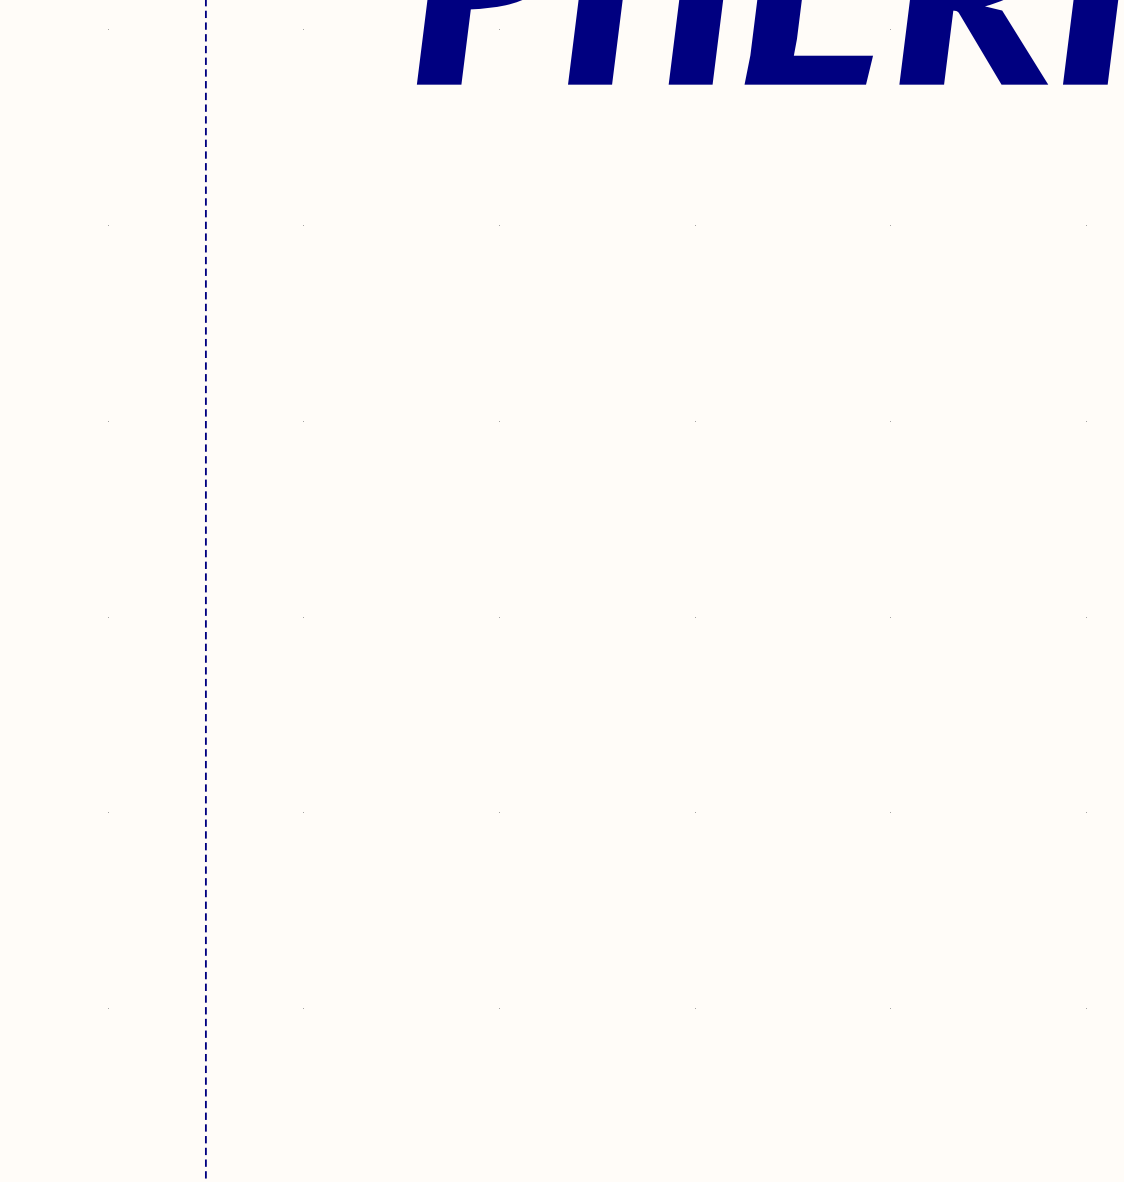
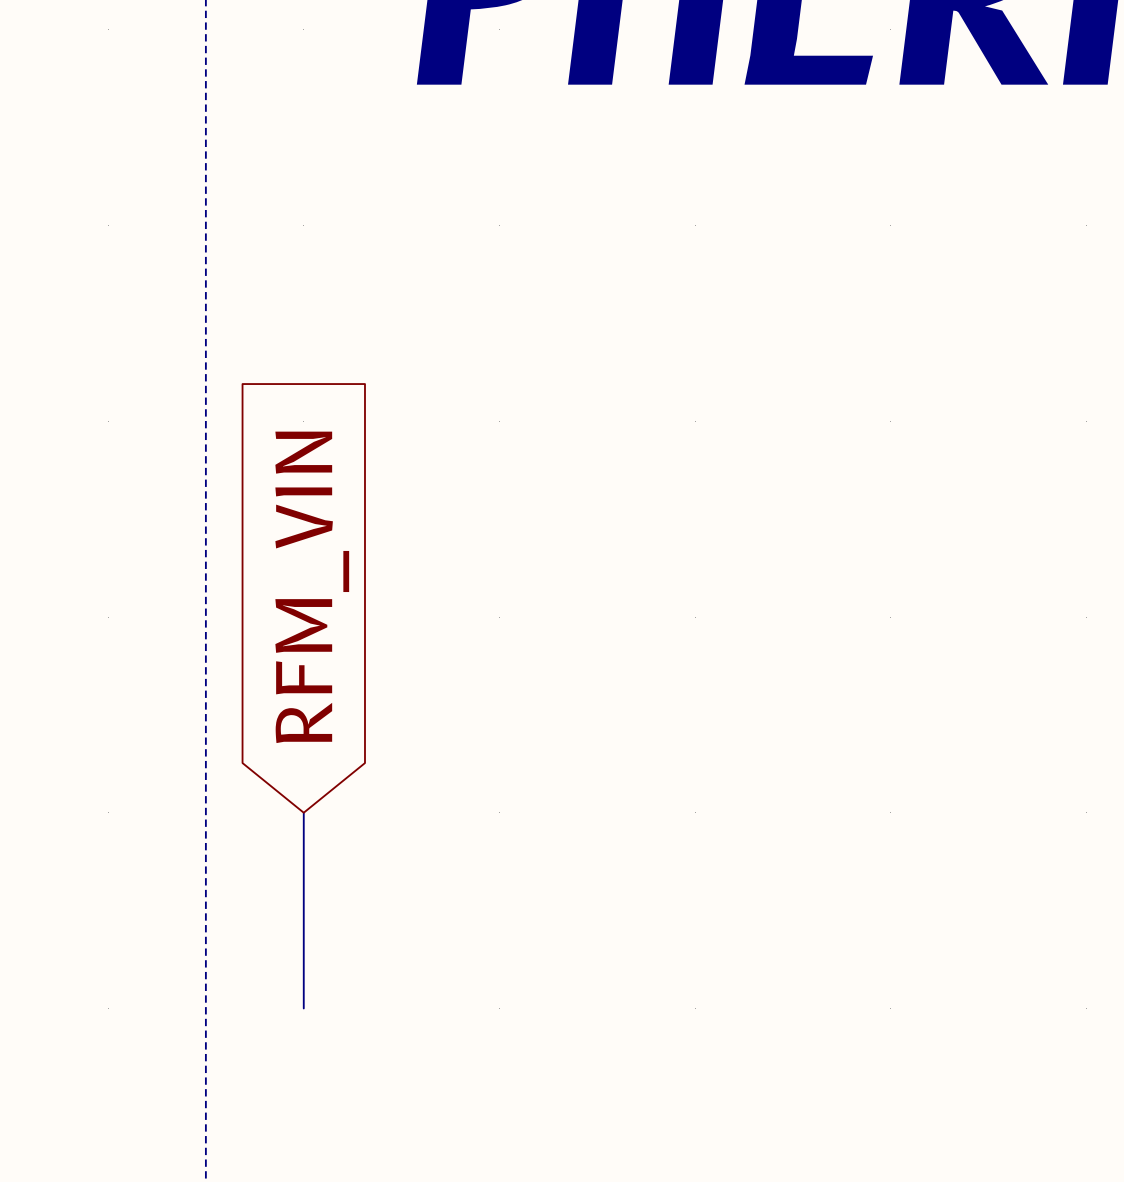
global label: none -> RFM_VIN (312, 587)
wire: none -> (303, 812) (303, 1008)

